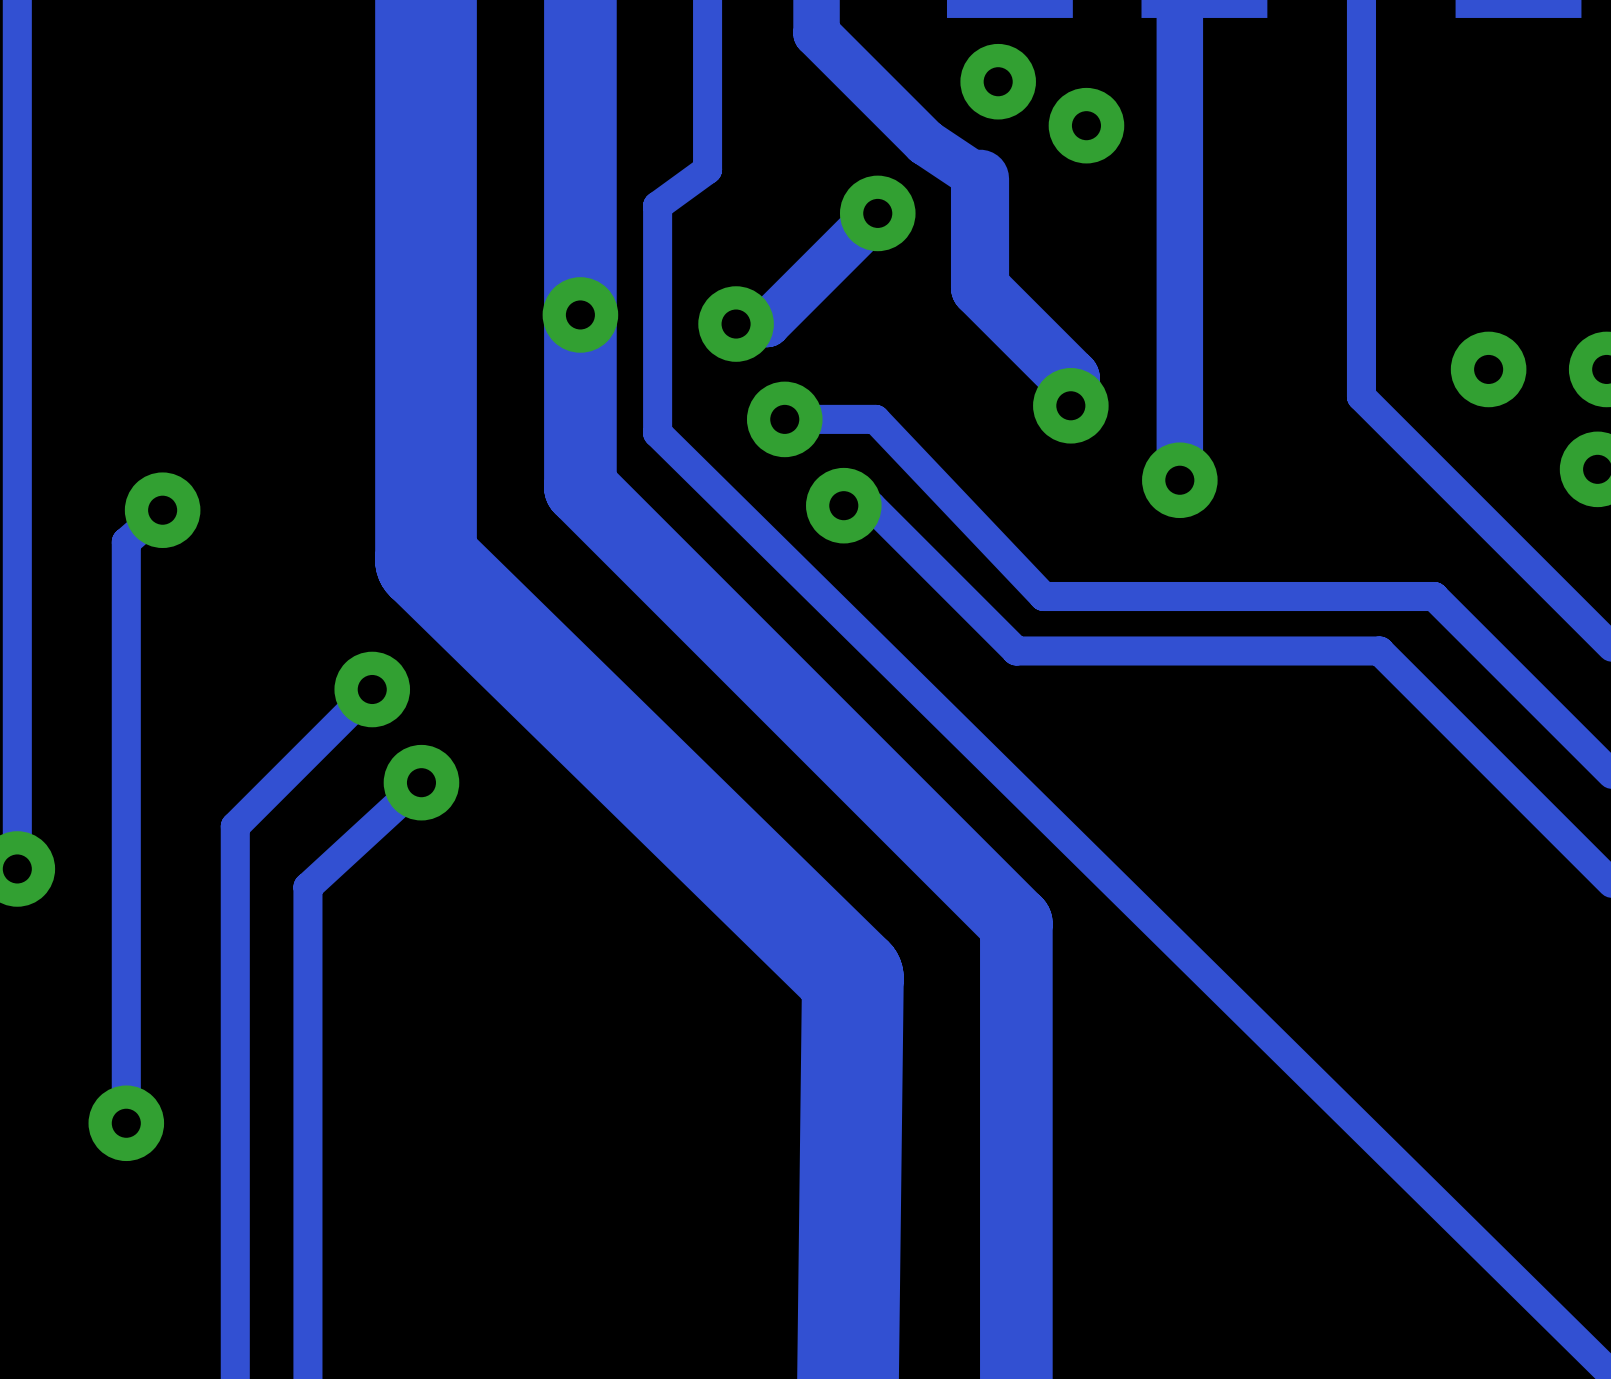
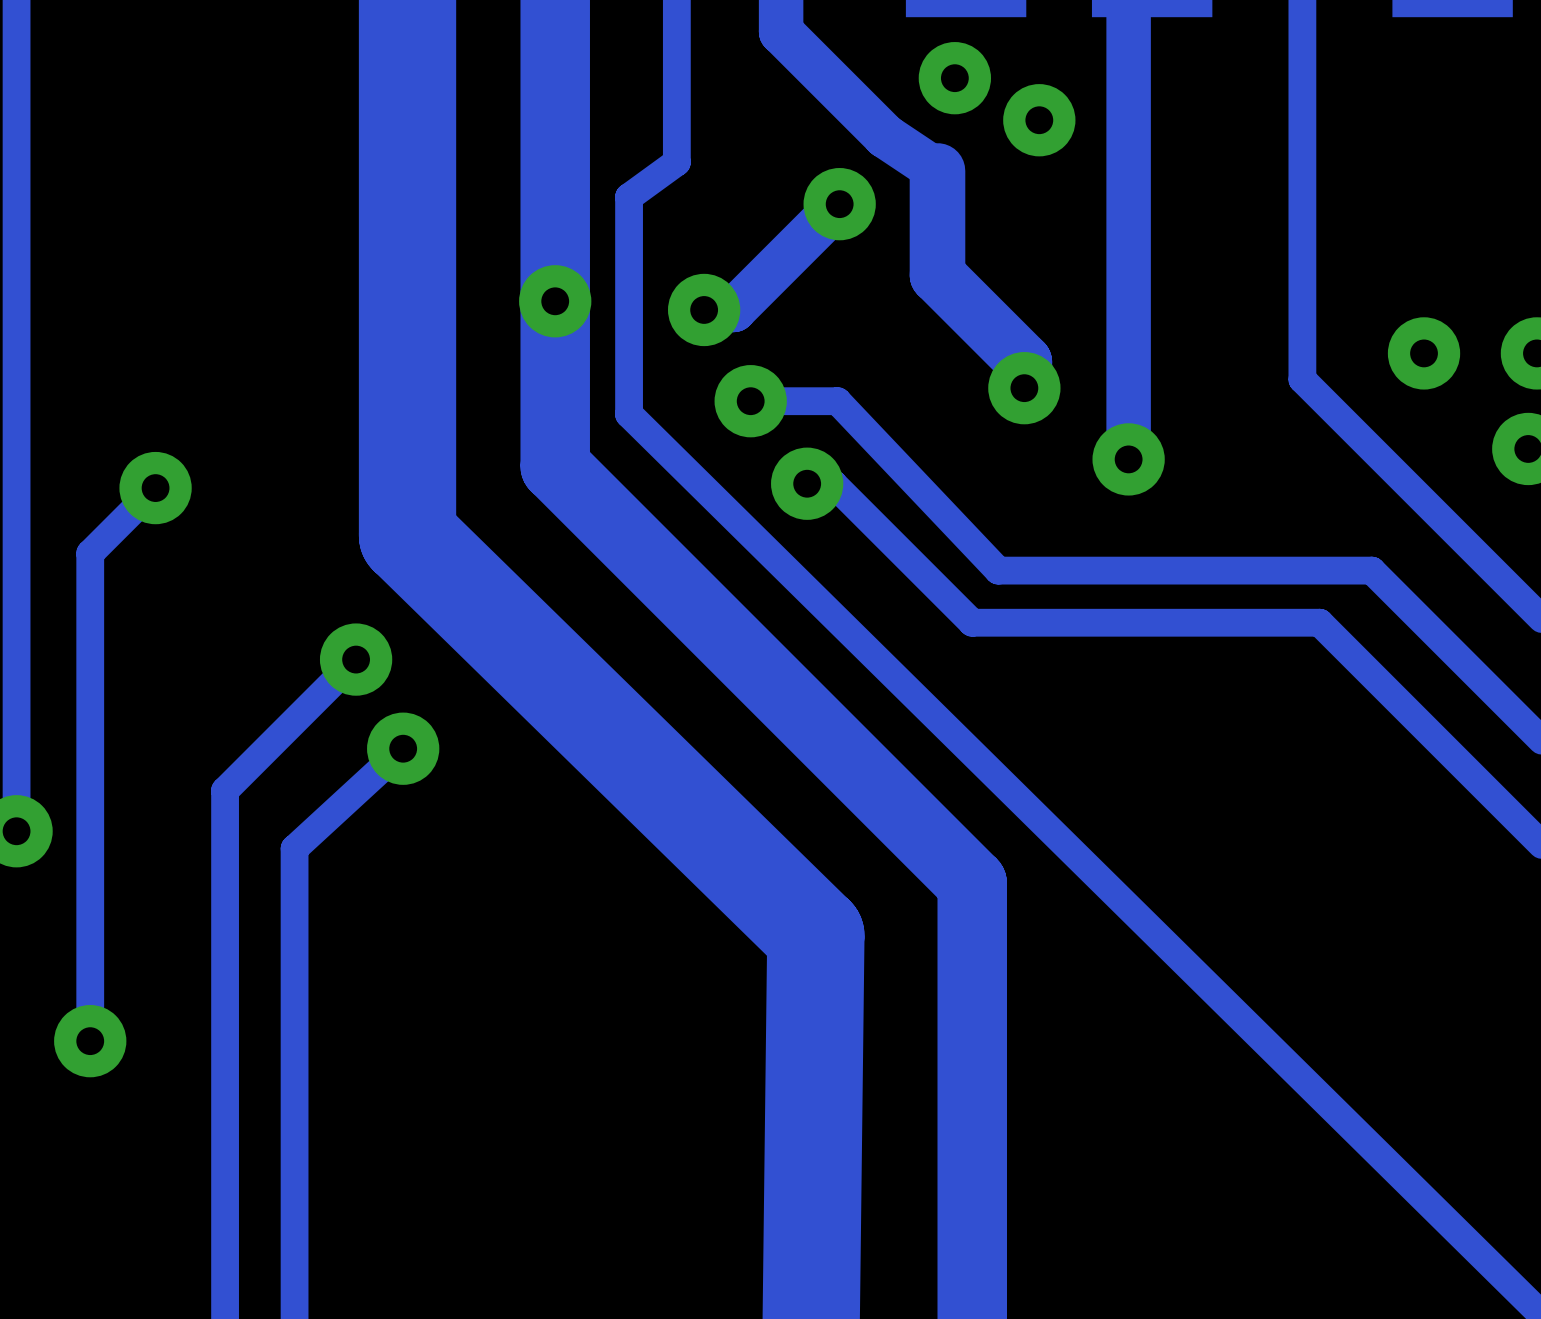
track: (162, 510) (126, 542) (126, 1123) -> (155, 488) (90, 553) (90, 1041)
via position: (126, 1123) -> (90, 1041)

